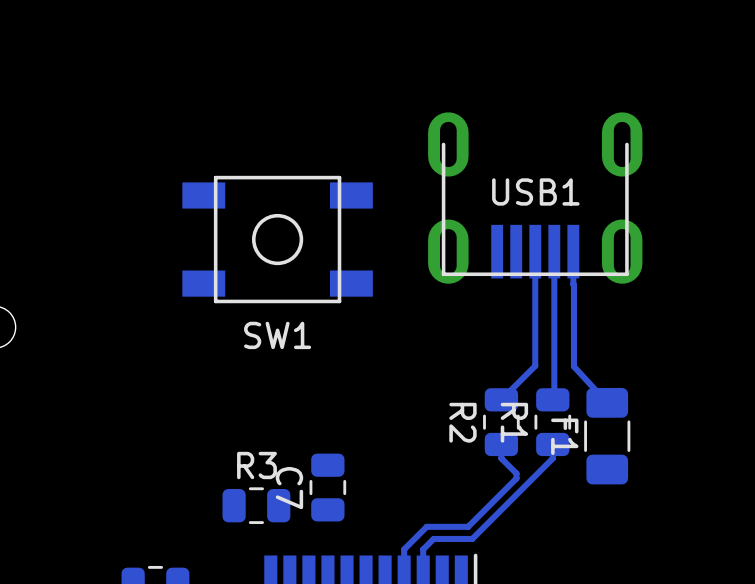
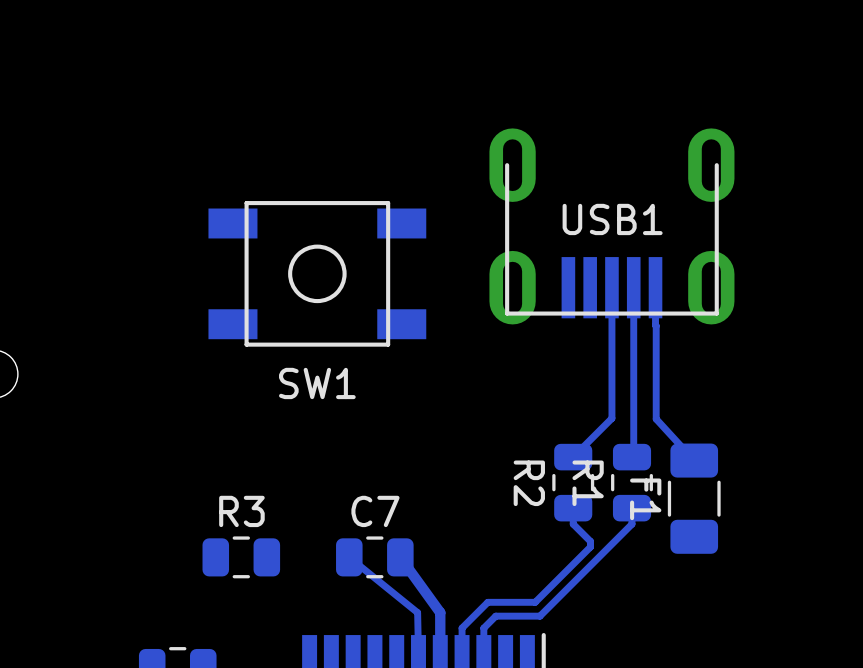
track: none -> (349, 557) (417, 612) (418, 655)
C7 rotation: 0° (327, 487) -> 90° clockwise (374, 557)
track: none -> (400, 557) (440, 612) (440, 655)
R3 position: (256, 505) -> (241, 557)

